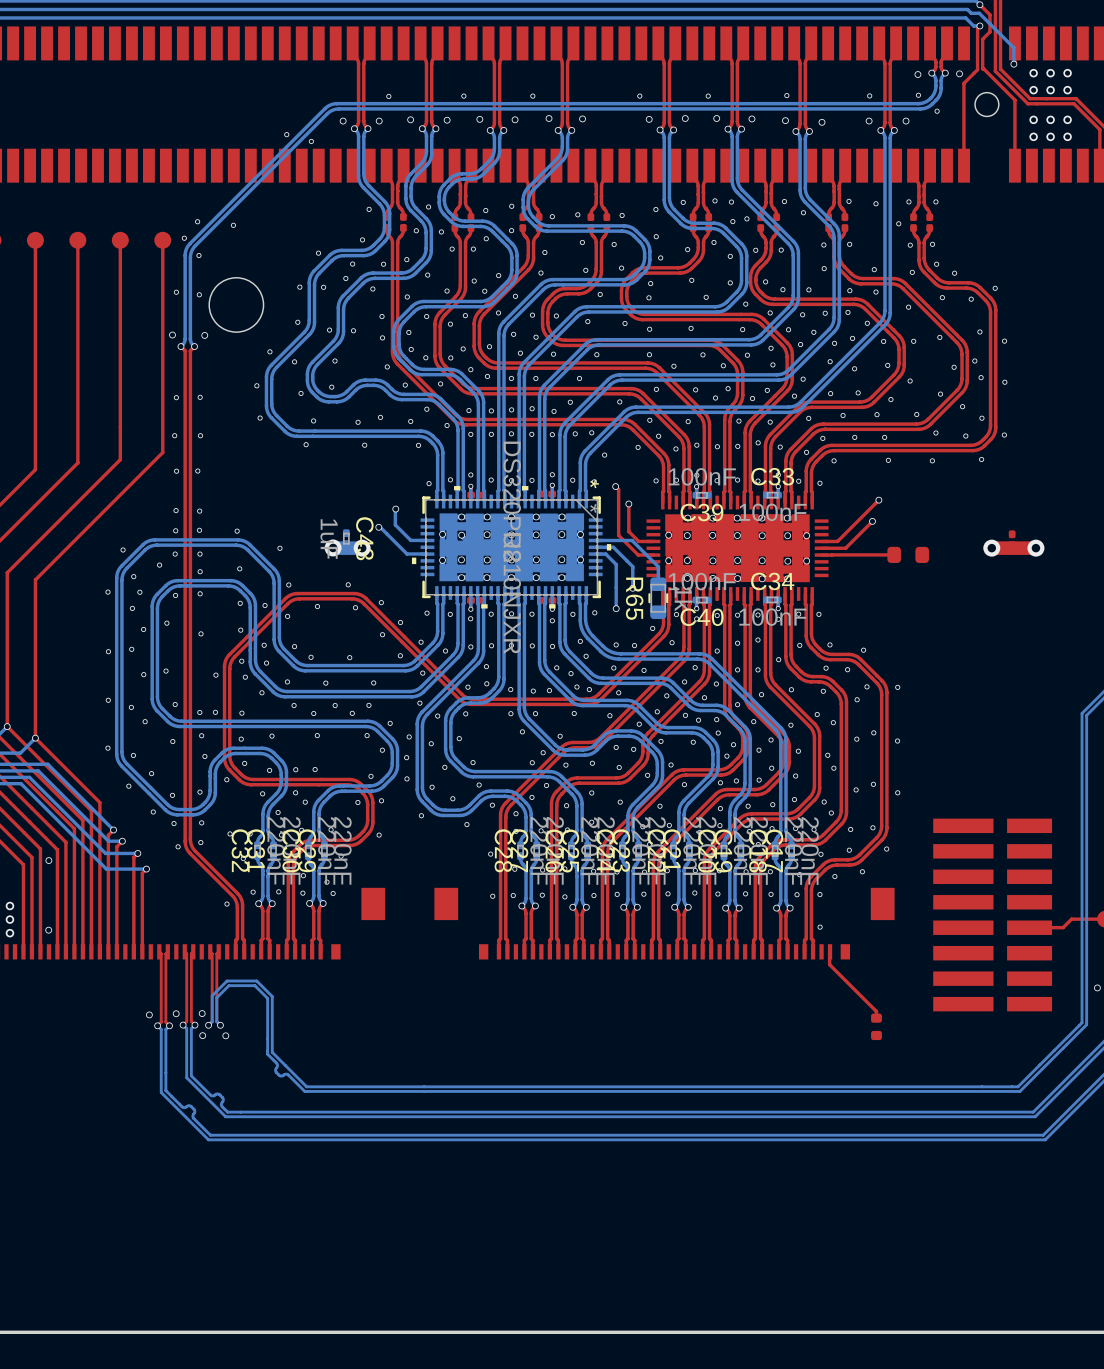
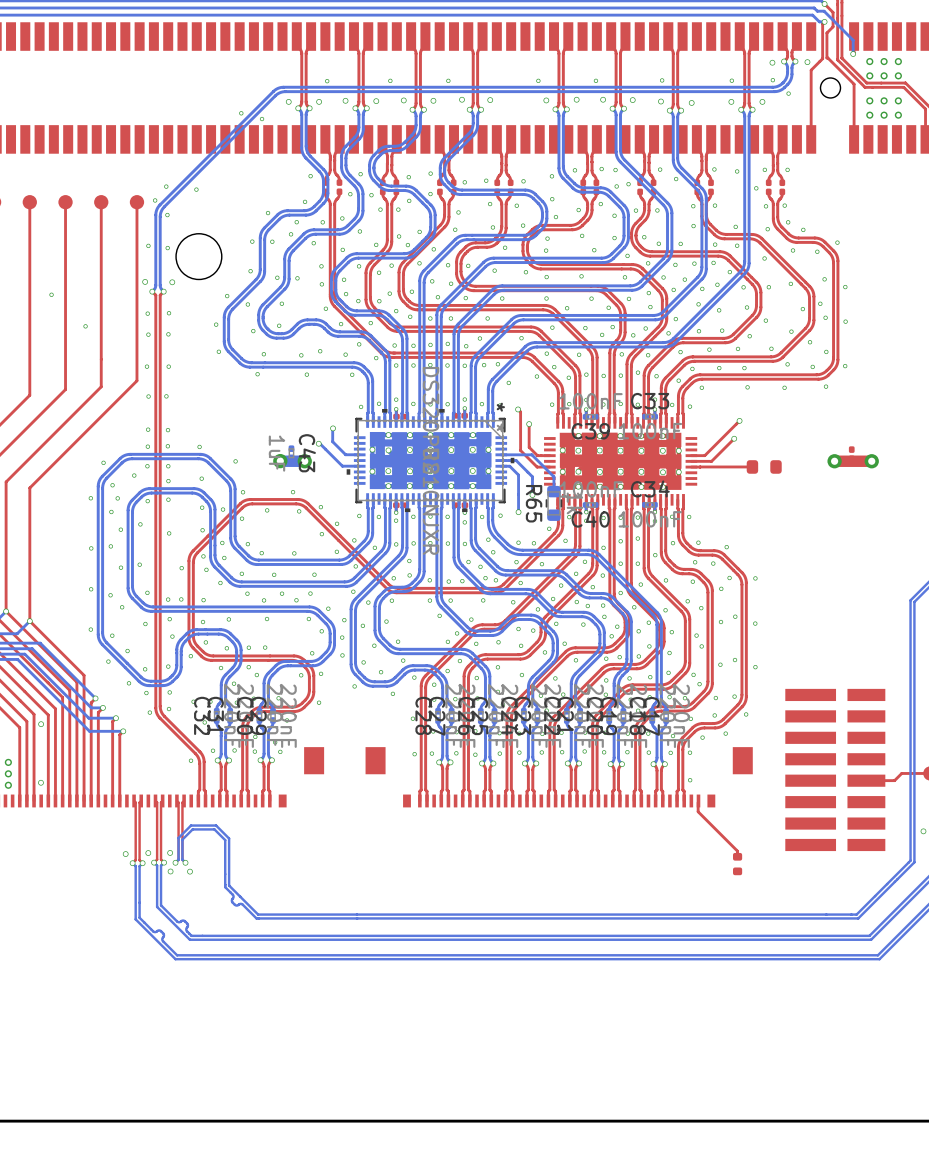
via: none -> (51, 294)
via: none -> (147, 313)
via: none -> (169, 313)
via: none -> (85, 326)

